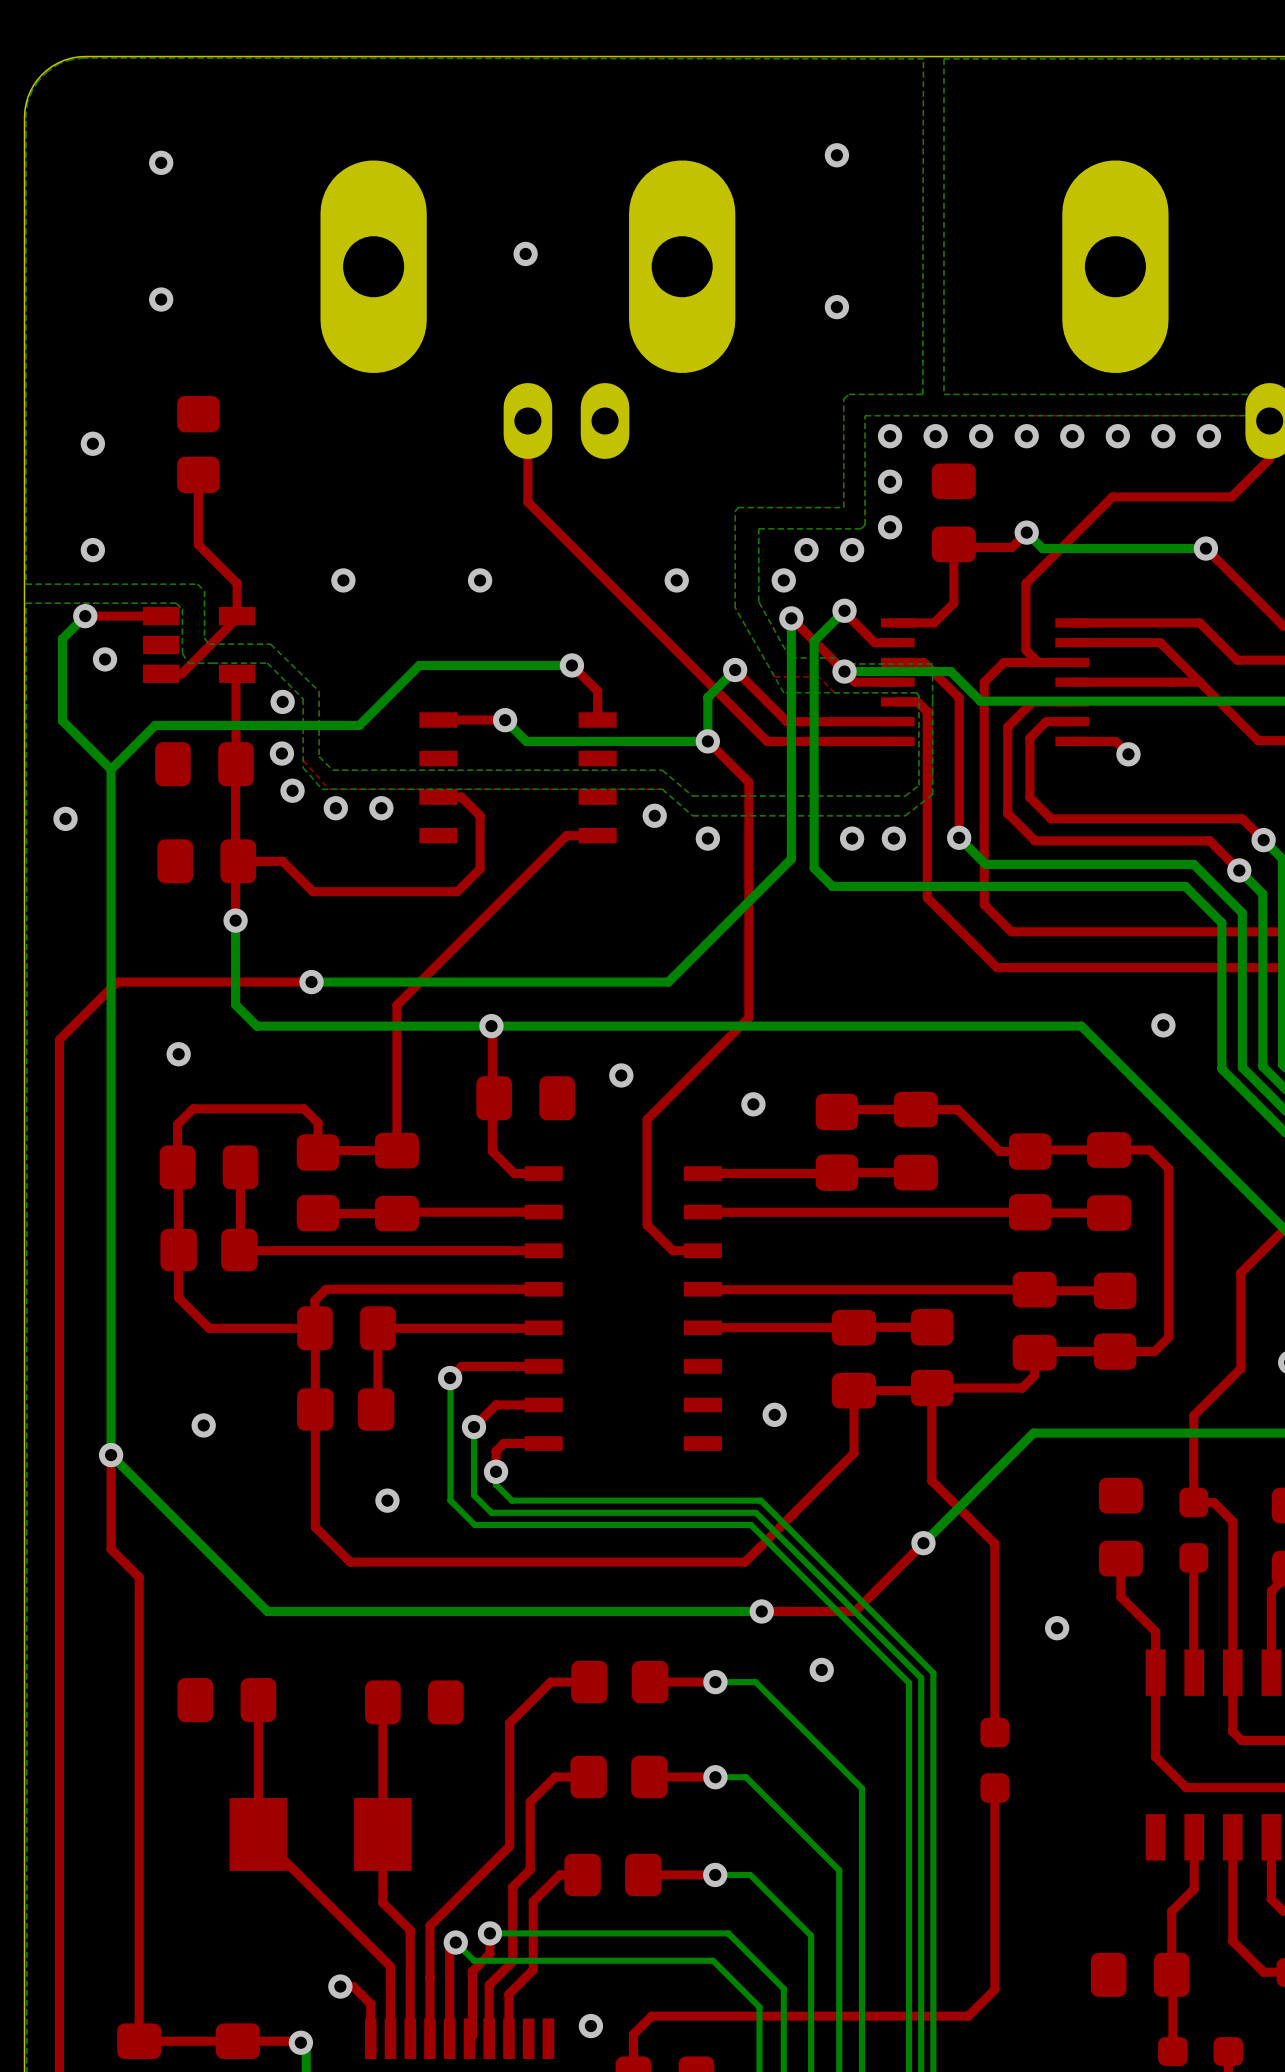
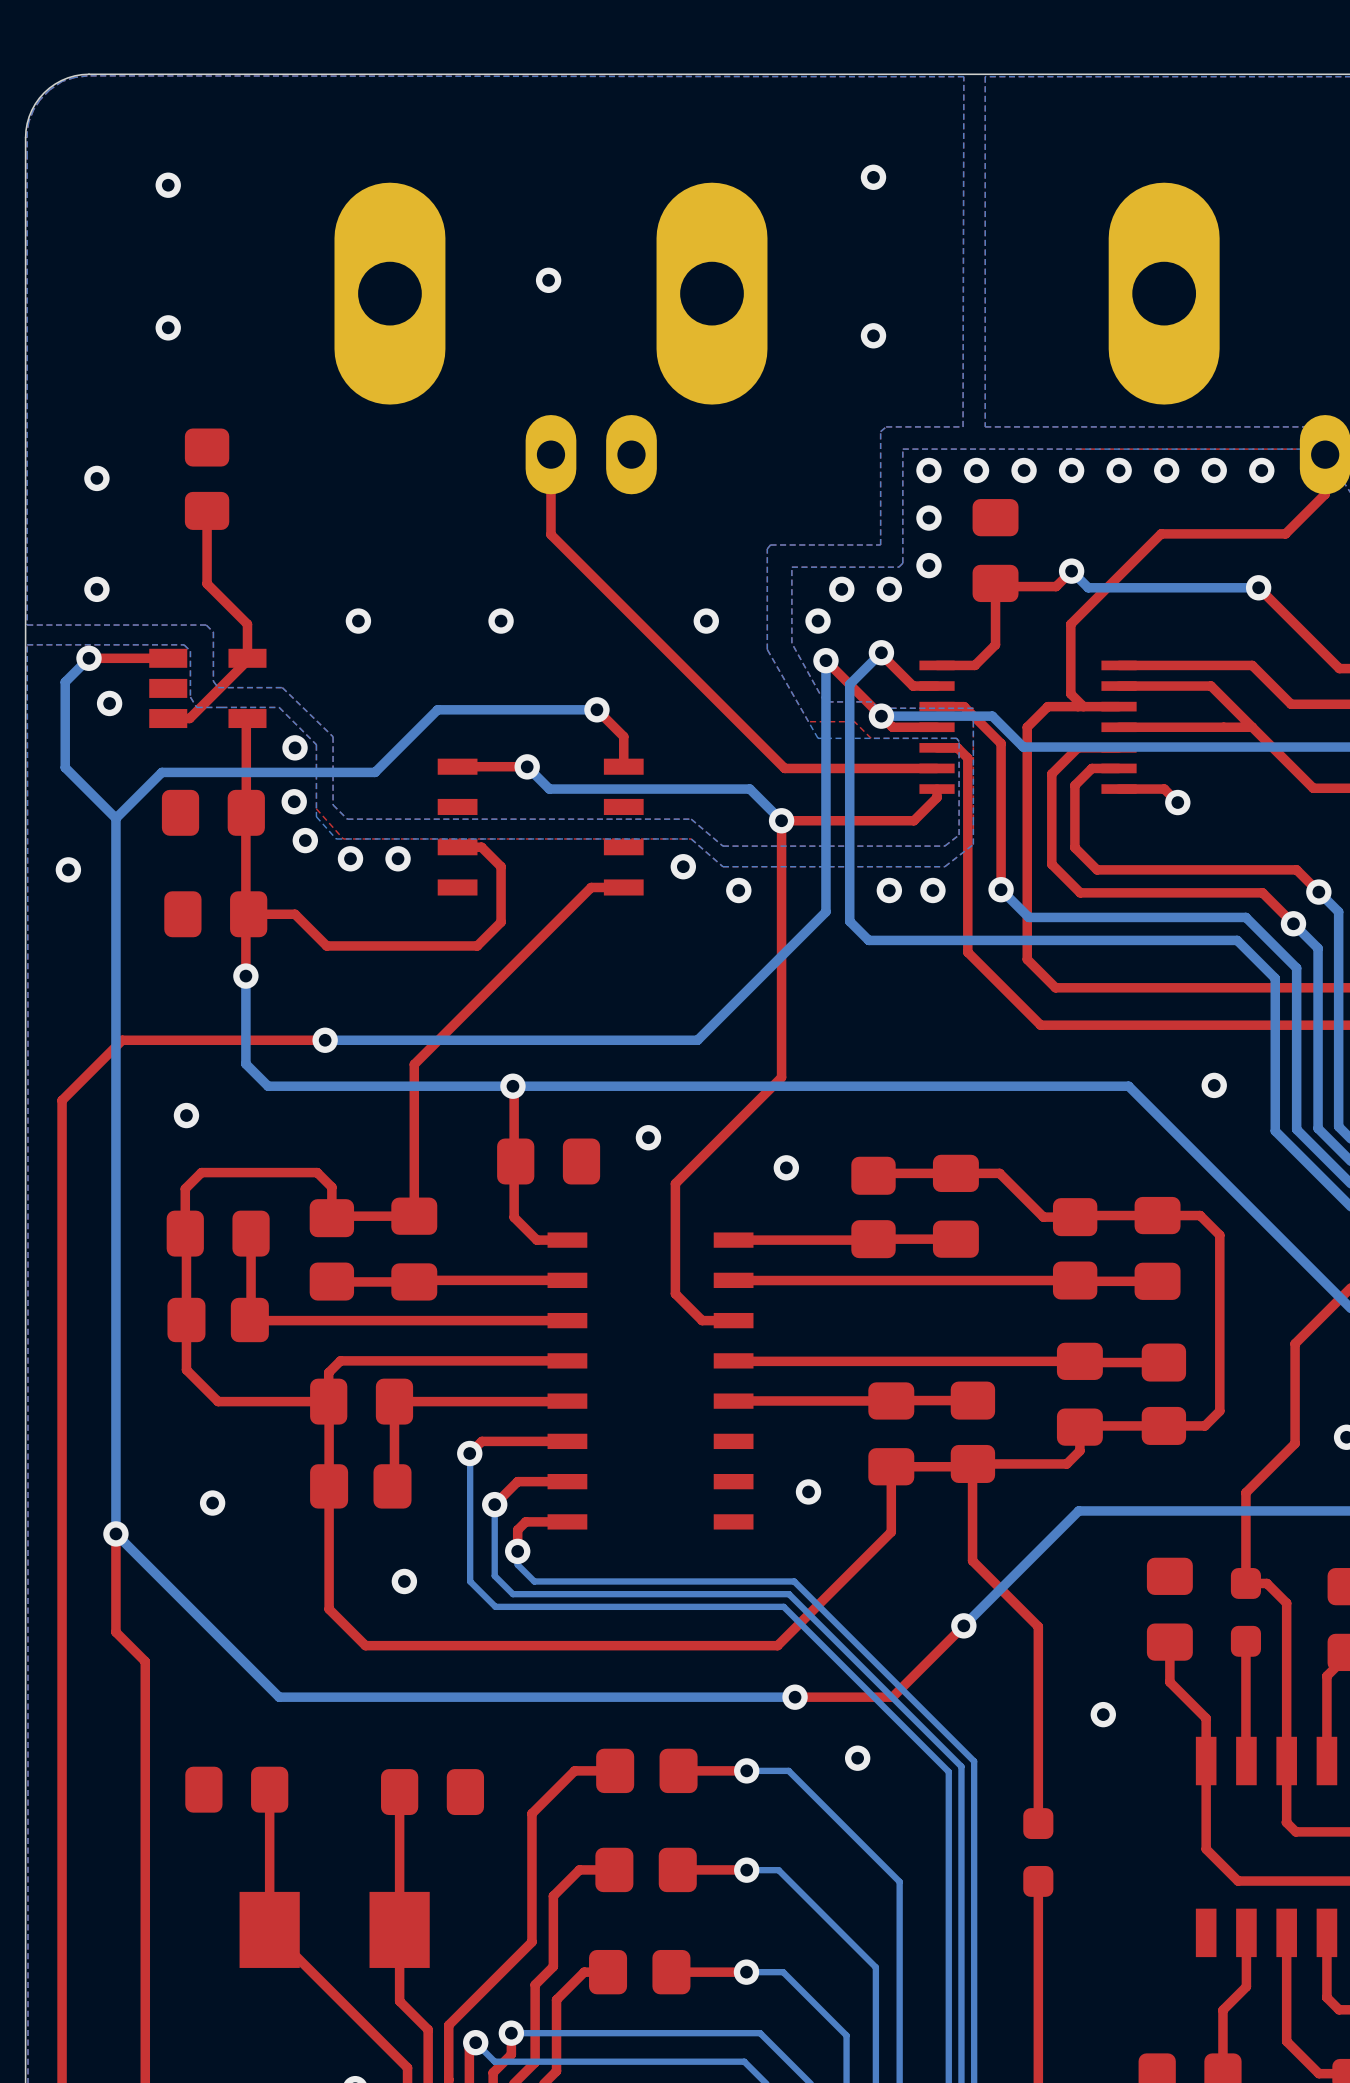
top track: (527, 497) (527, 502) (767, 741) (897, 741) -> (550, 534) (784, 768) (821, 768)
top track: (735, 670) (786, 721) -> none
bottom track: (735, 670) (707, 697) (707, 741) -> (781, 820) (749, 789) (738, 789)
via: (735, 670) -> none
top track: (707, 741) (748, 782) -> (937, 789) (937, 797) (913, 820) (781, 820) (781, 831)
via position: (707, 741) -> (781, 820)

